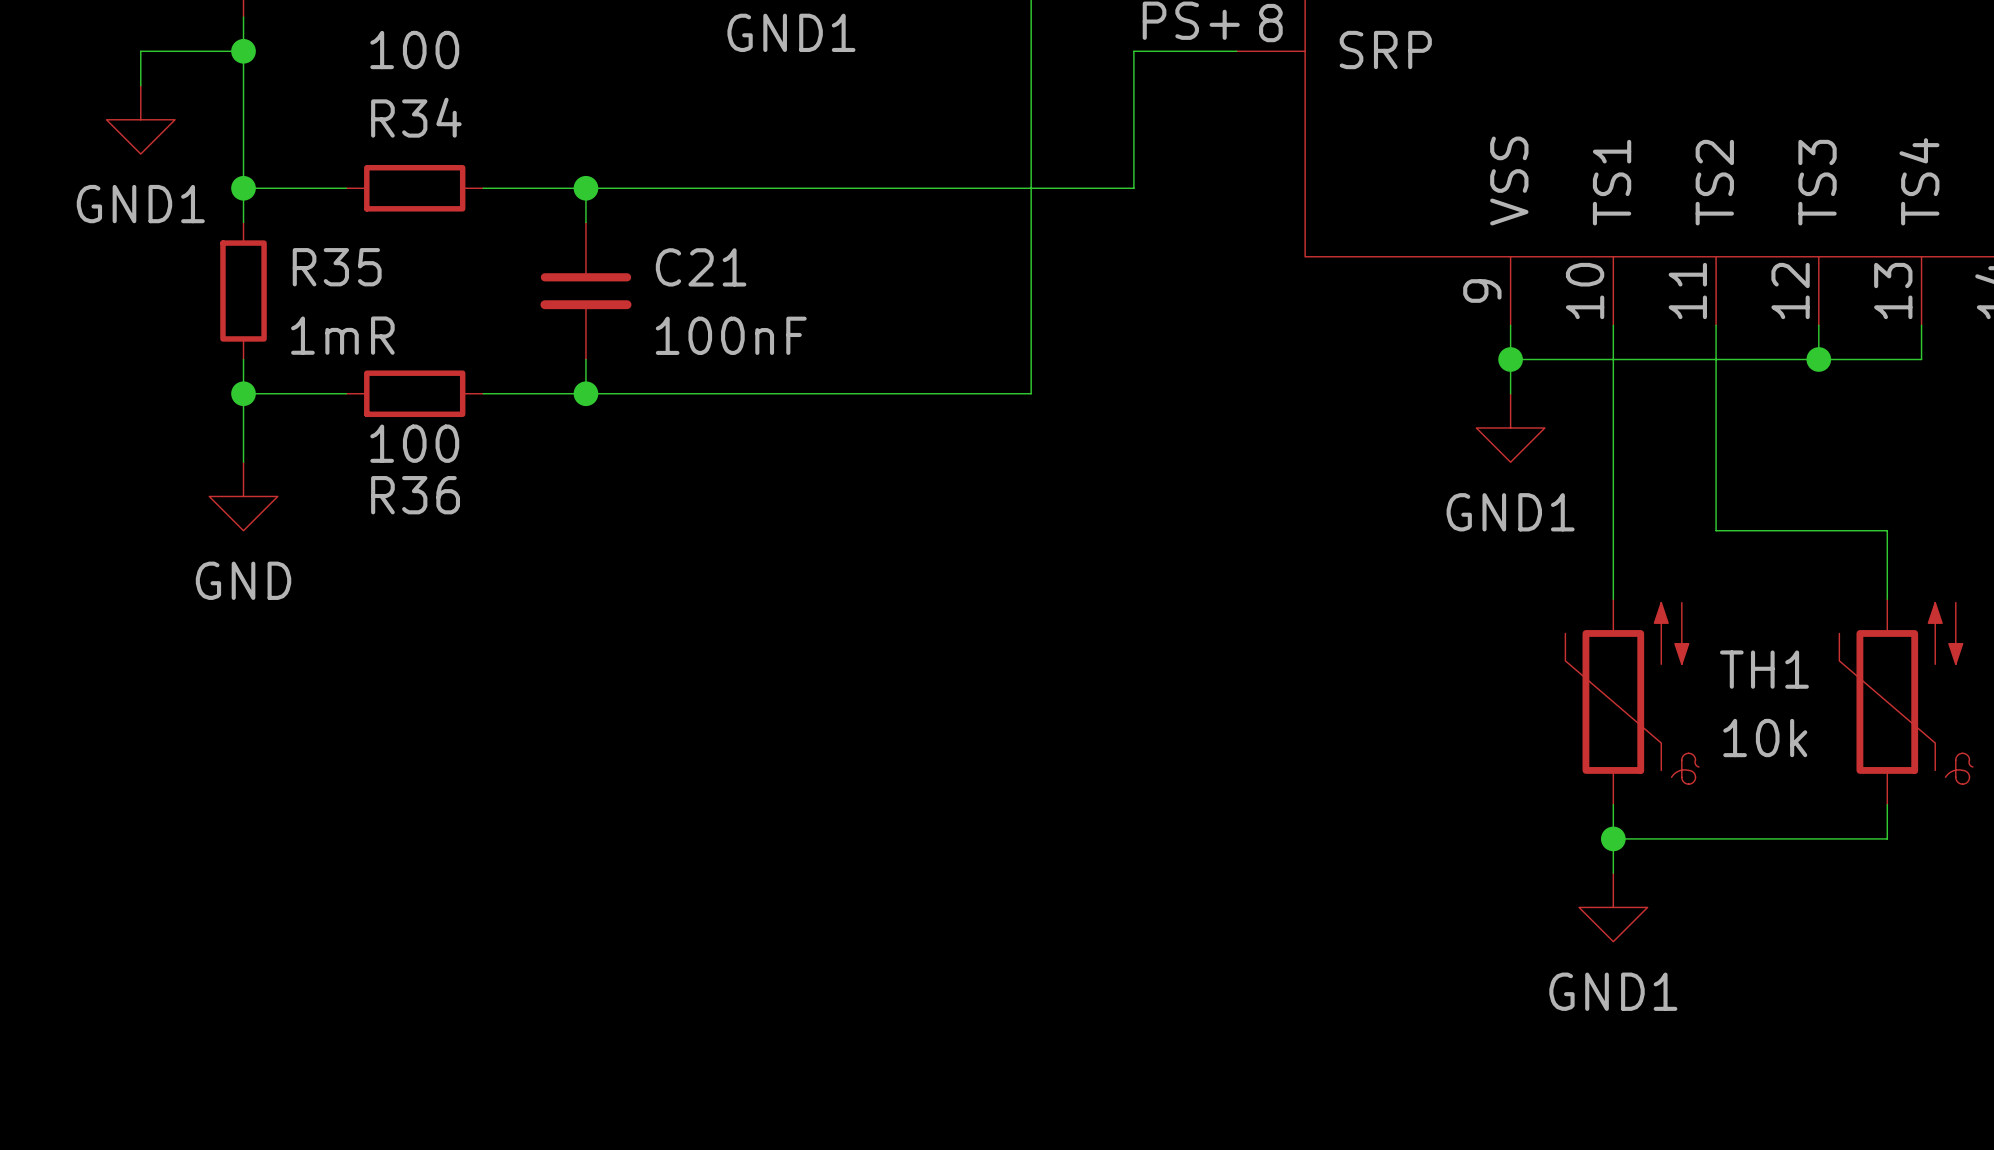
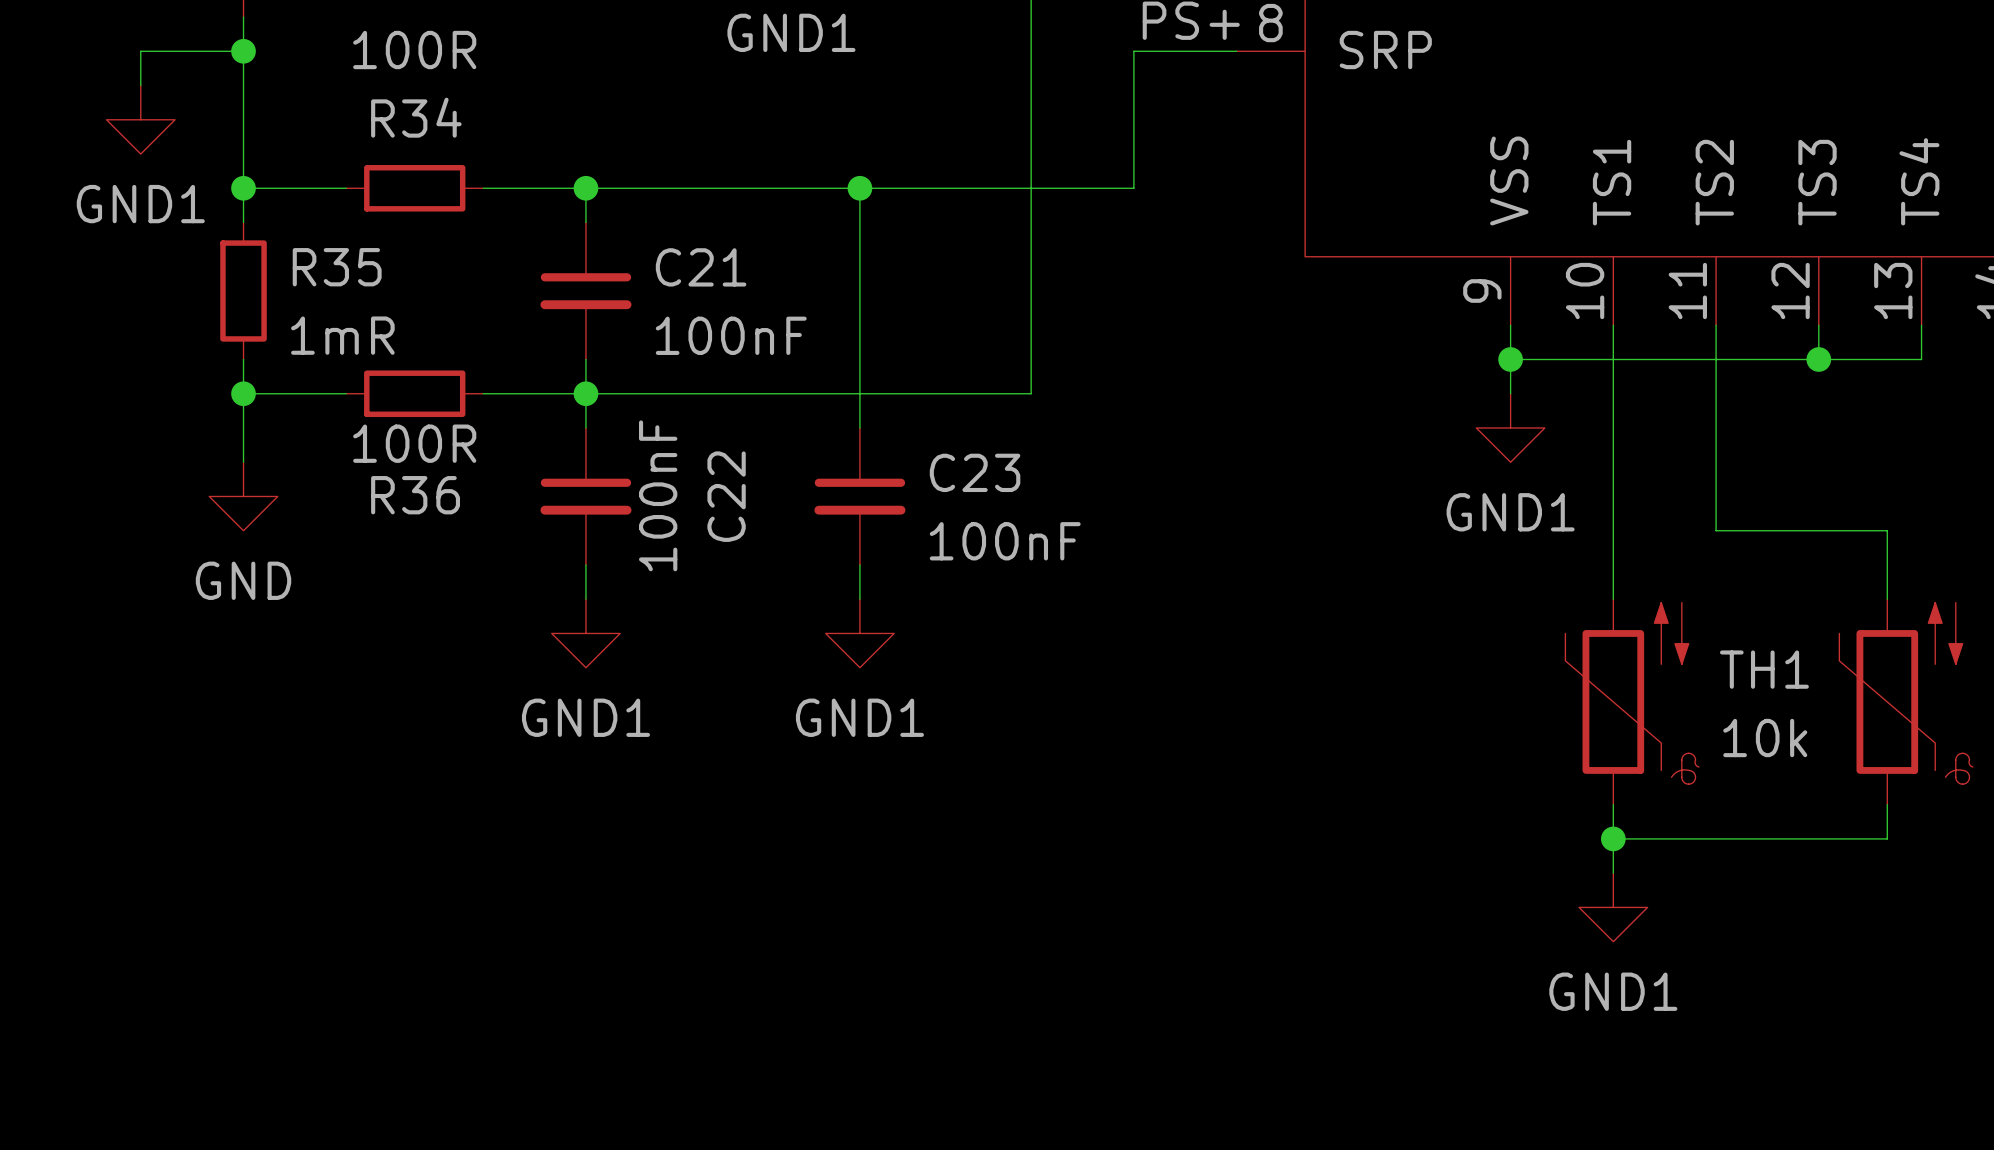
R34 value: 100 (414, 50) -> 100R (414, 50)
wire: none -> (859, 188) (859, 427)
junction: none -> (859, 188)
wire: none -> (585, 393) (585, 427)
R36 value: 100 (414, 443) -> 100R (414, 443)
C22: none -> 100nF (585, 496)
C23: none -> 100nF (859, 496)
wire: none -> (585, 564) (585, 599)
wire: none -> (859, 564) (859, 599)
power symbol: none -> GND1 (585, 633)
power symbol: none -> GND1 (859, 633)

